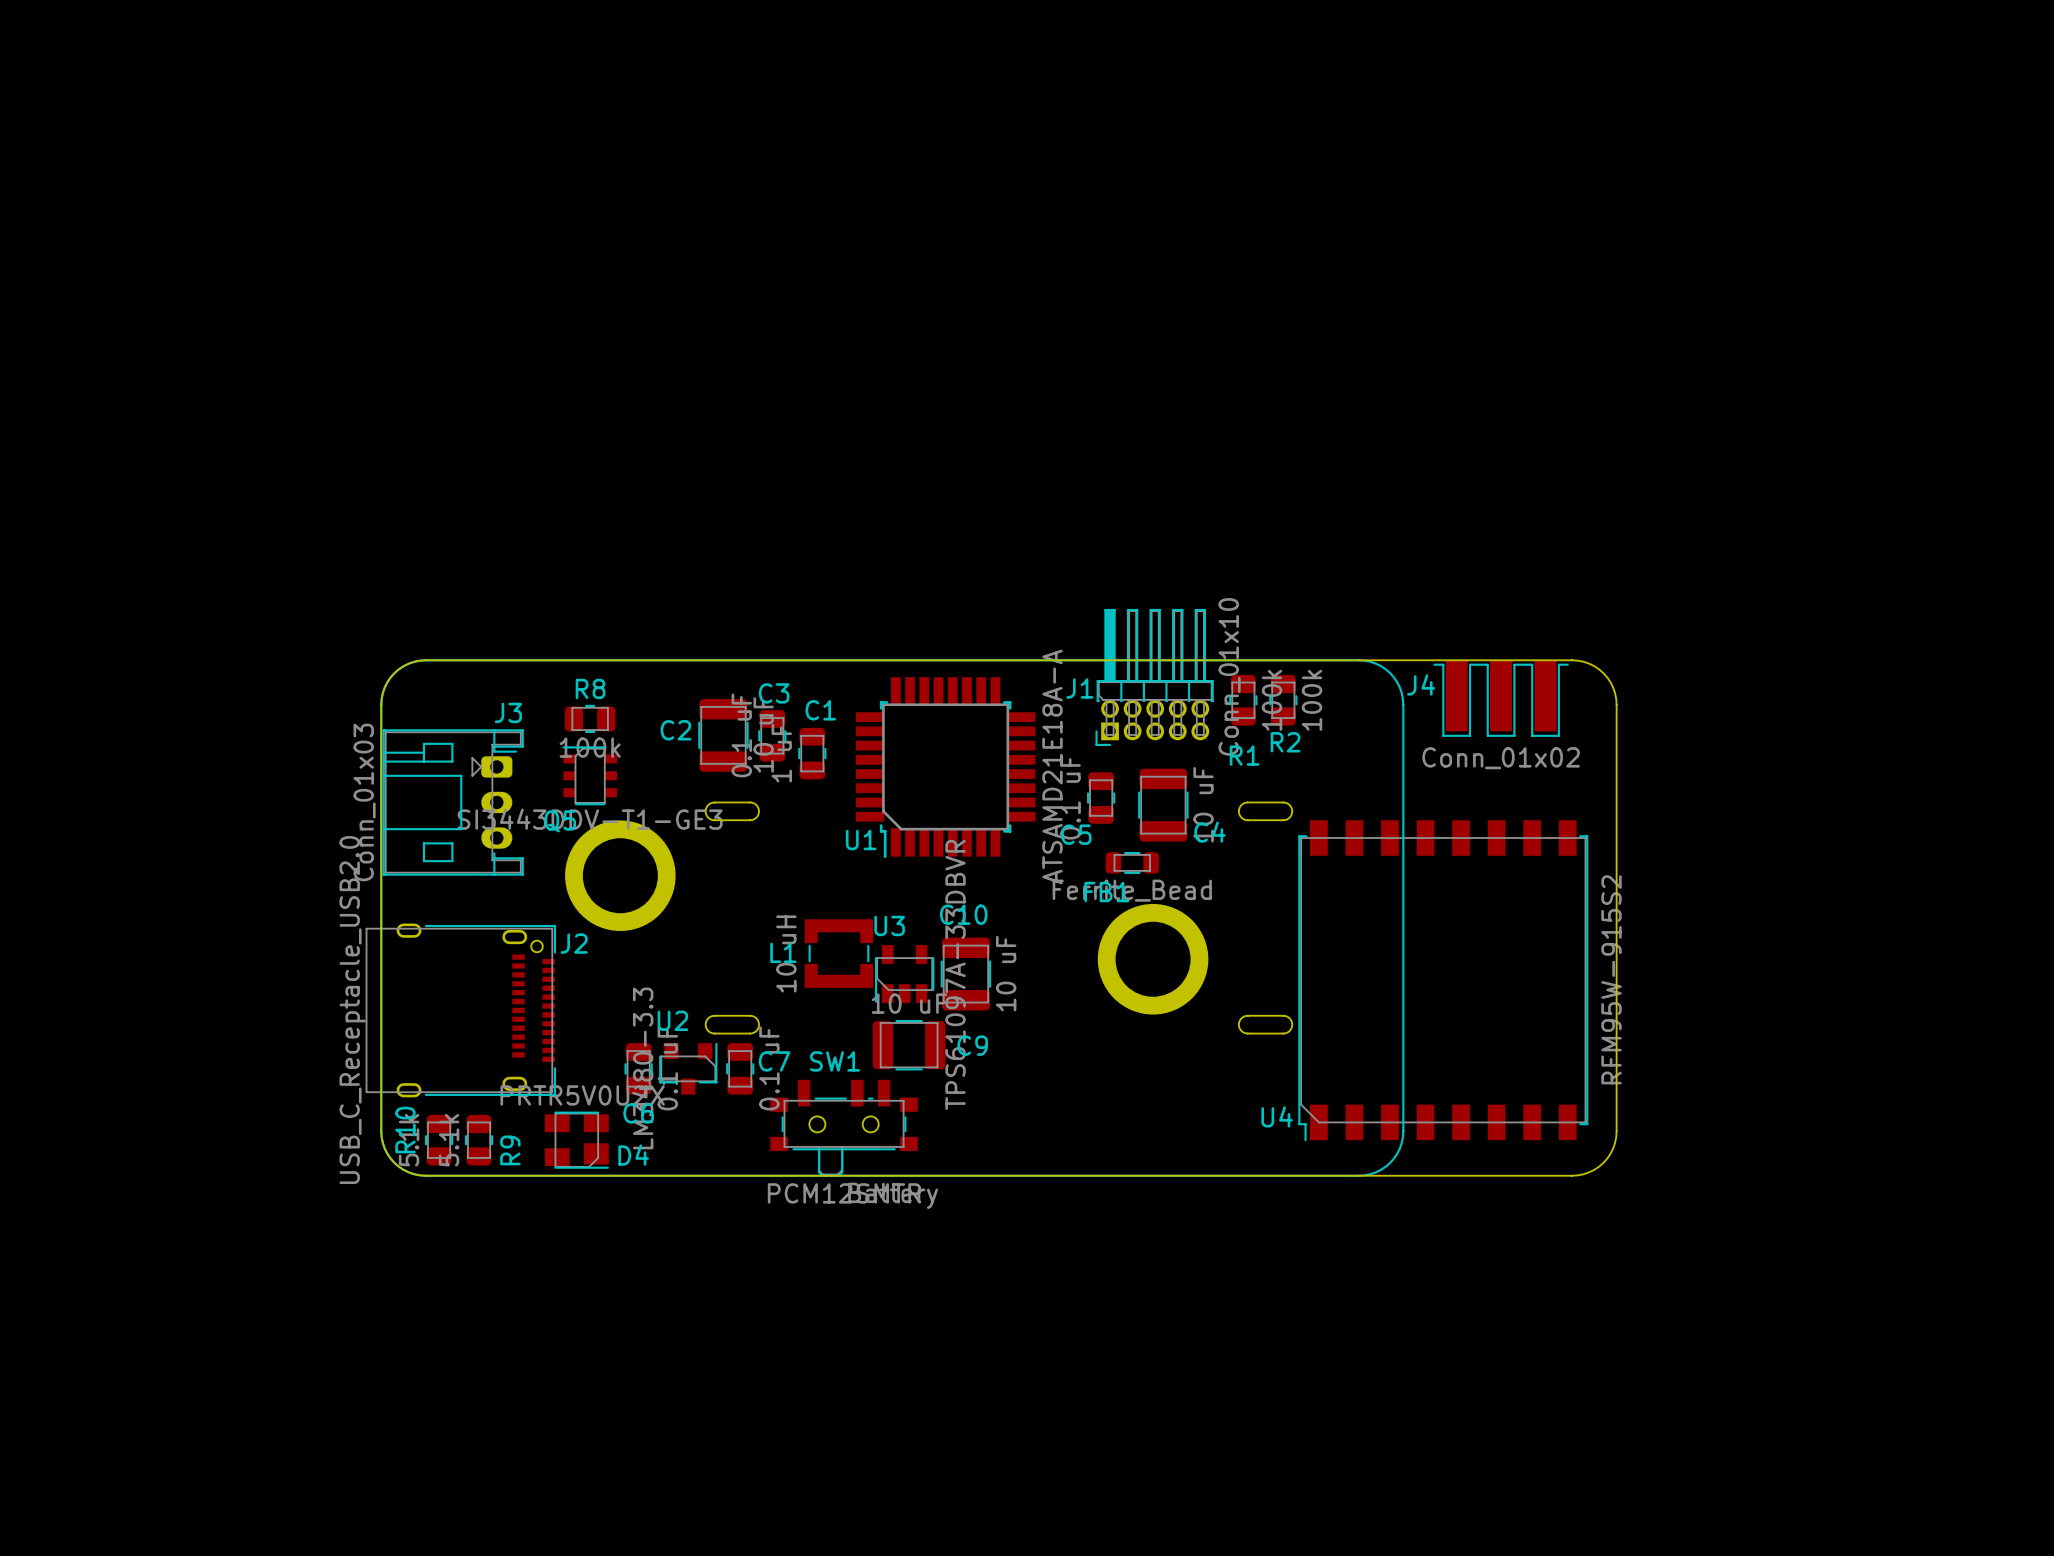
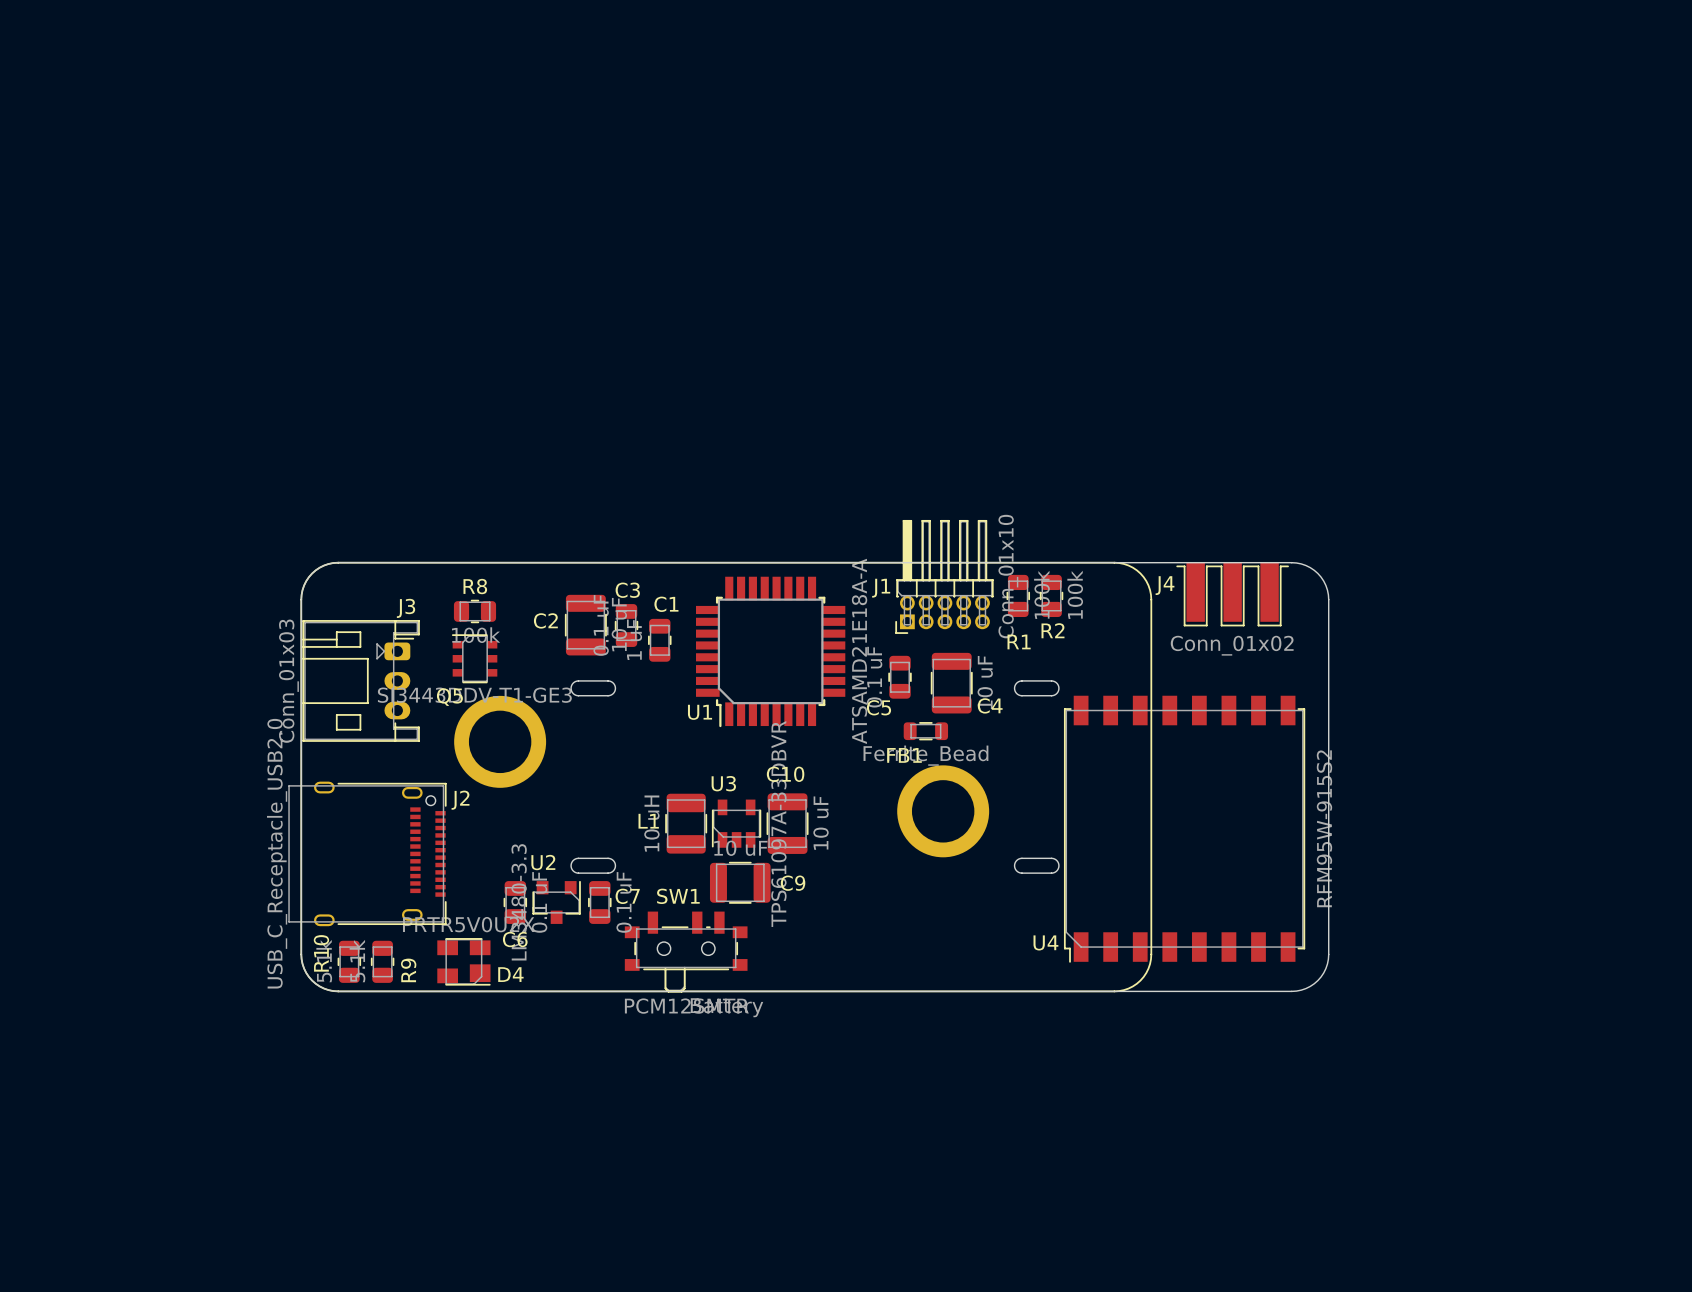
L1 footprint: [804, 919, 874, 988] -> [665, 793, 708, 854]

